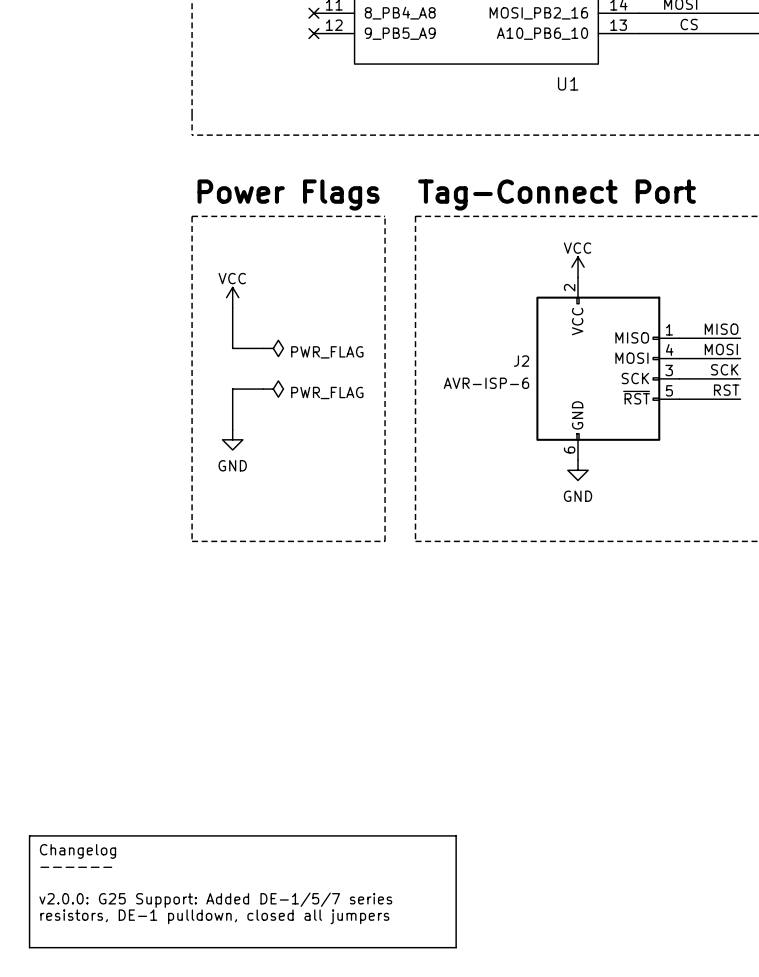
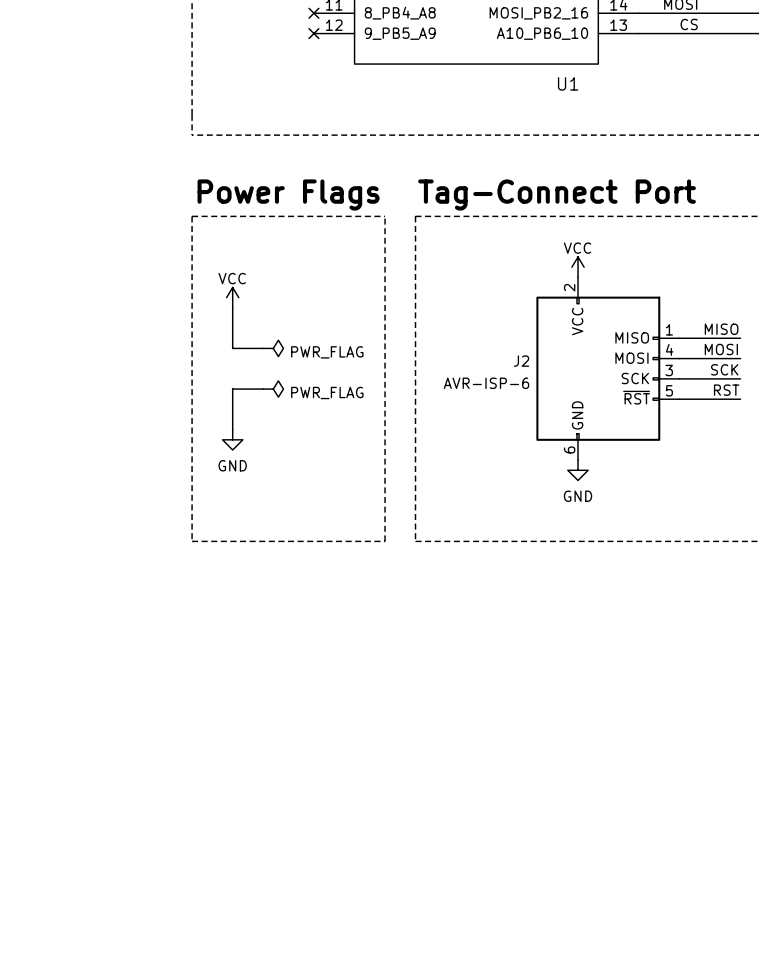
line: (29, 835) (456, 835) (456, 947) (29, 947) (29, 835) -> none
text: Changelog (78, 851) -> none
text: ------ (76, 867) -> none
text: v2.0.0: G25 Support: Added DE-1/5/7 series (215, 900) -> none
text: resistors, DE-1 pulldown, closed all jumpers (214, 916) -> none

